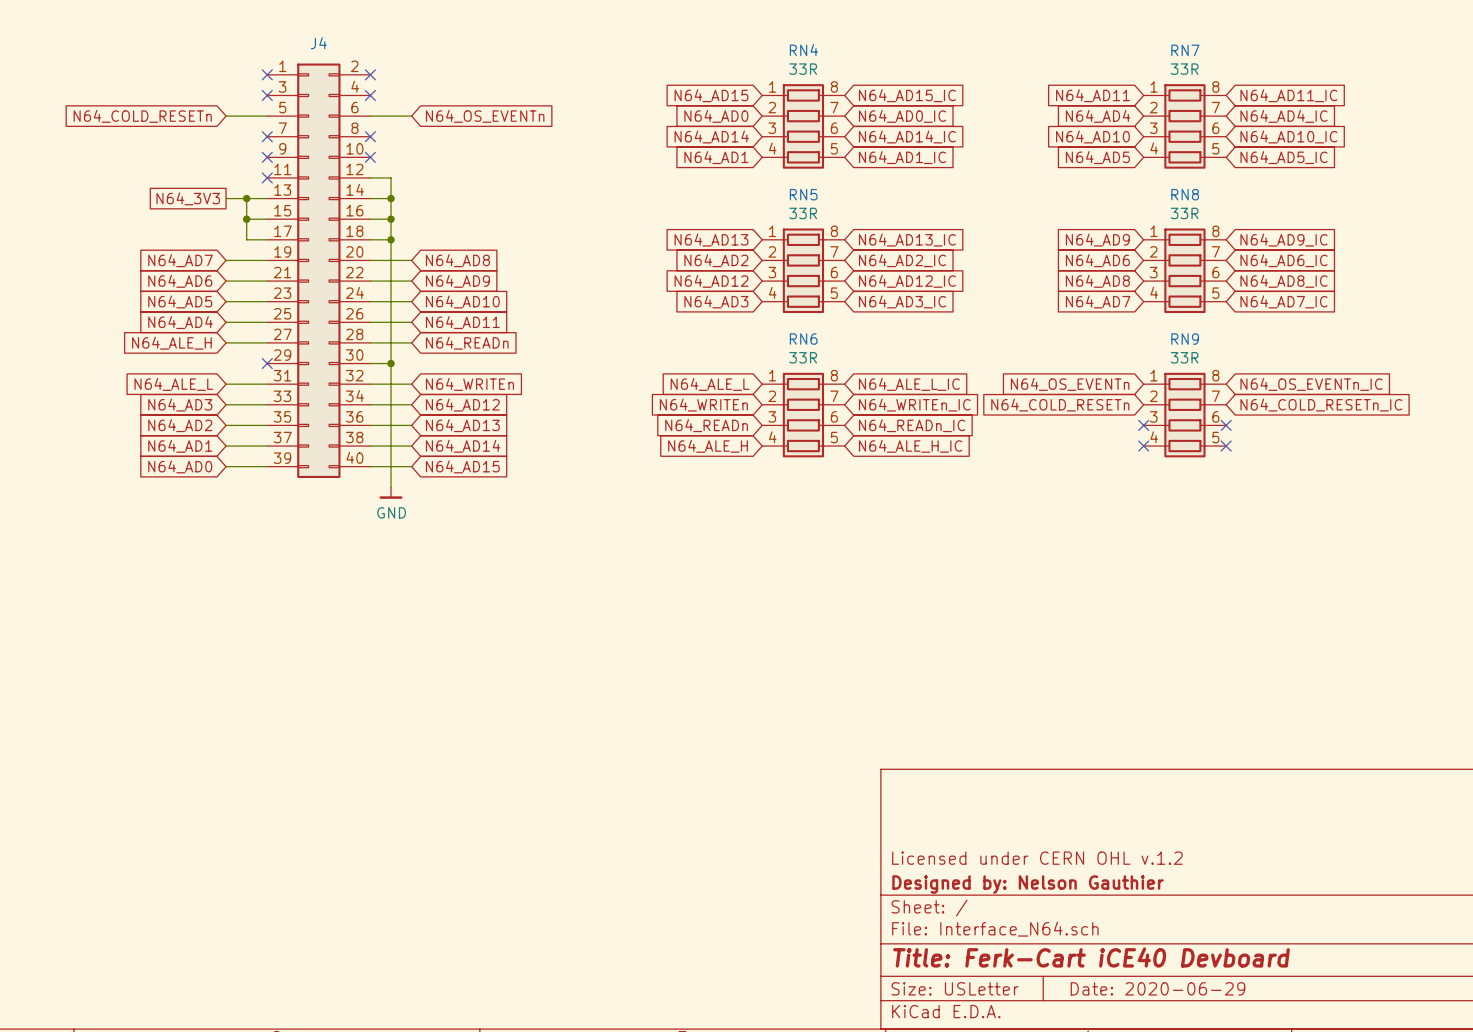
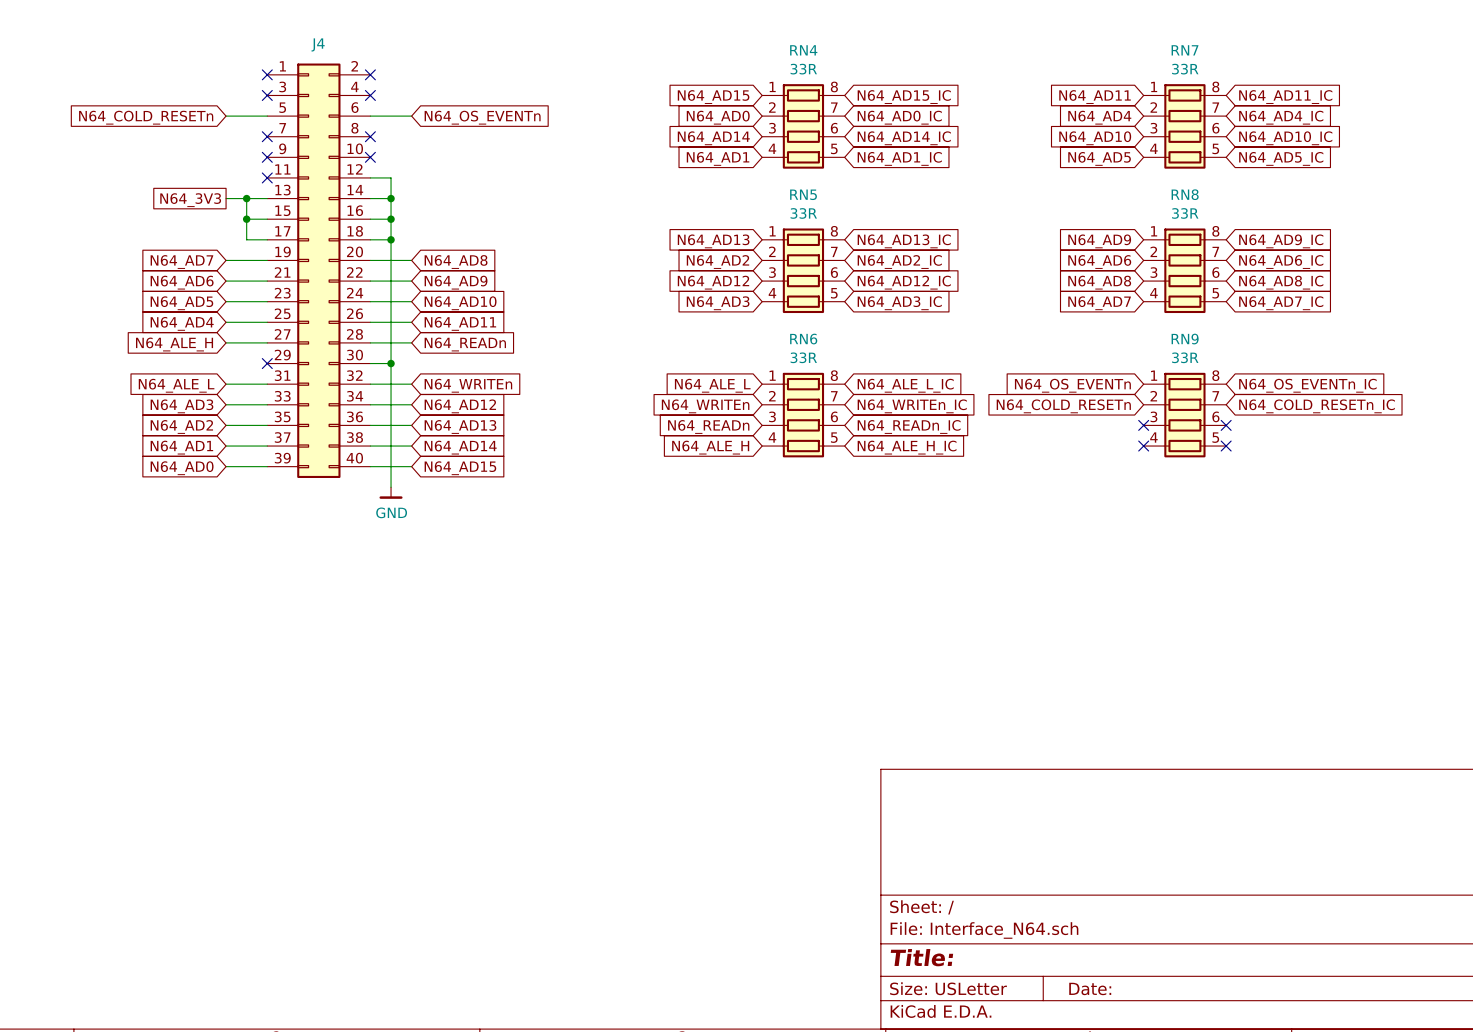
title block: Licensed under CERN OHL v.1.2 (1037, 858) -> none
title block: Designed by: Nelson Gauthier (1028, 884) -> none
title block: Title: Ferk-Cart iCE40 Devboard (1091, 957) -> Title: (921, 957)
title block: Date: 2020-06-29 (1158, 988) -> Date: (1090, 988)

